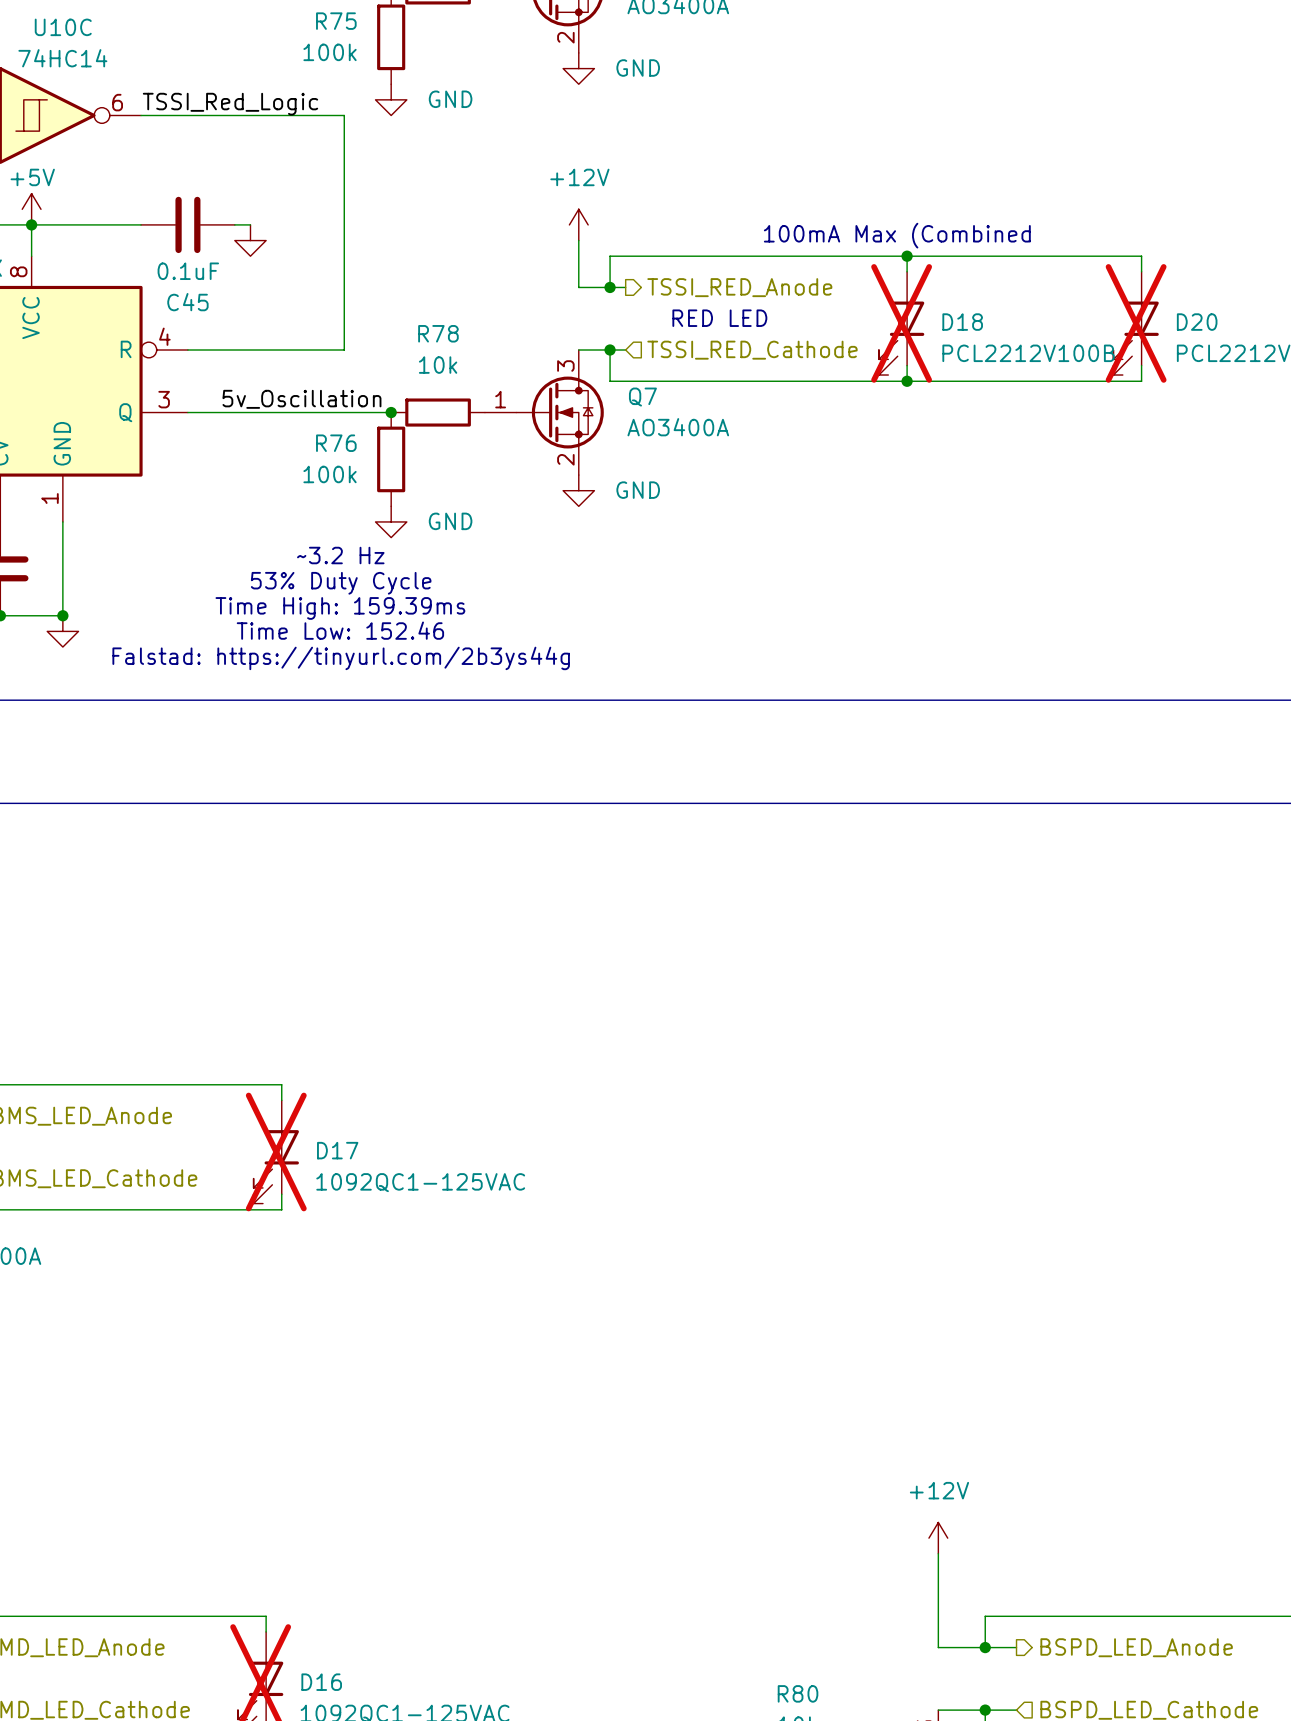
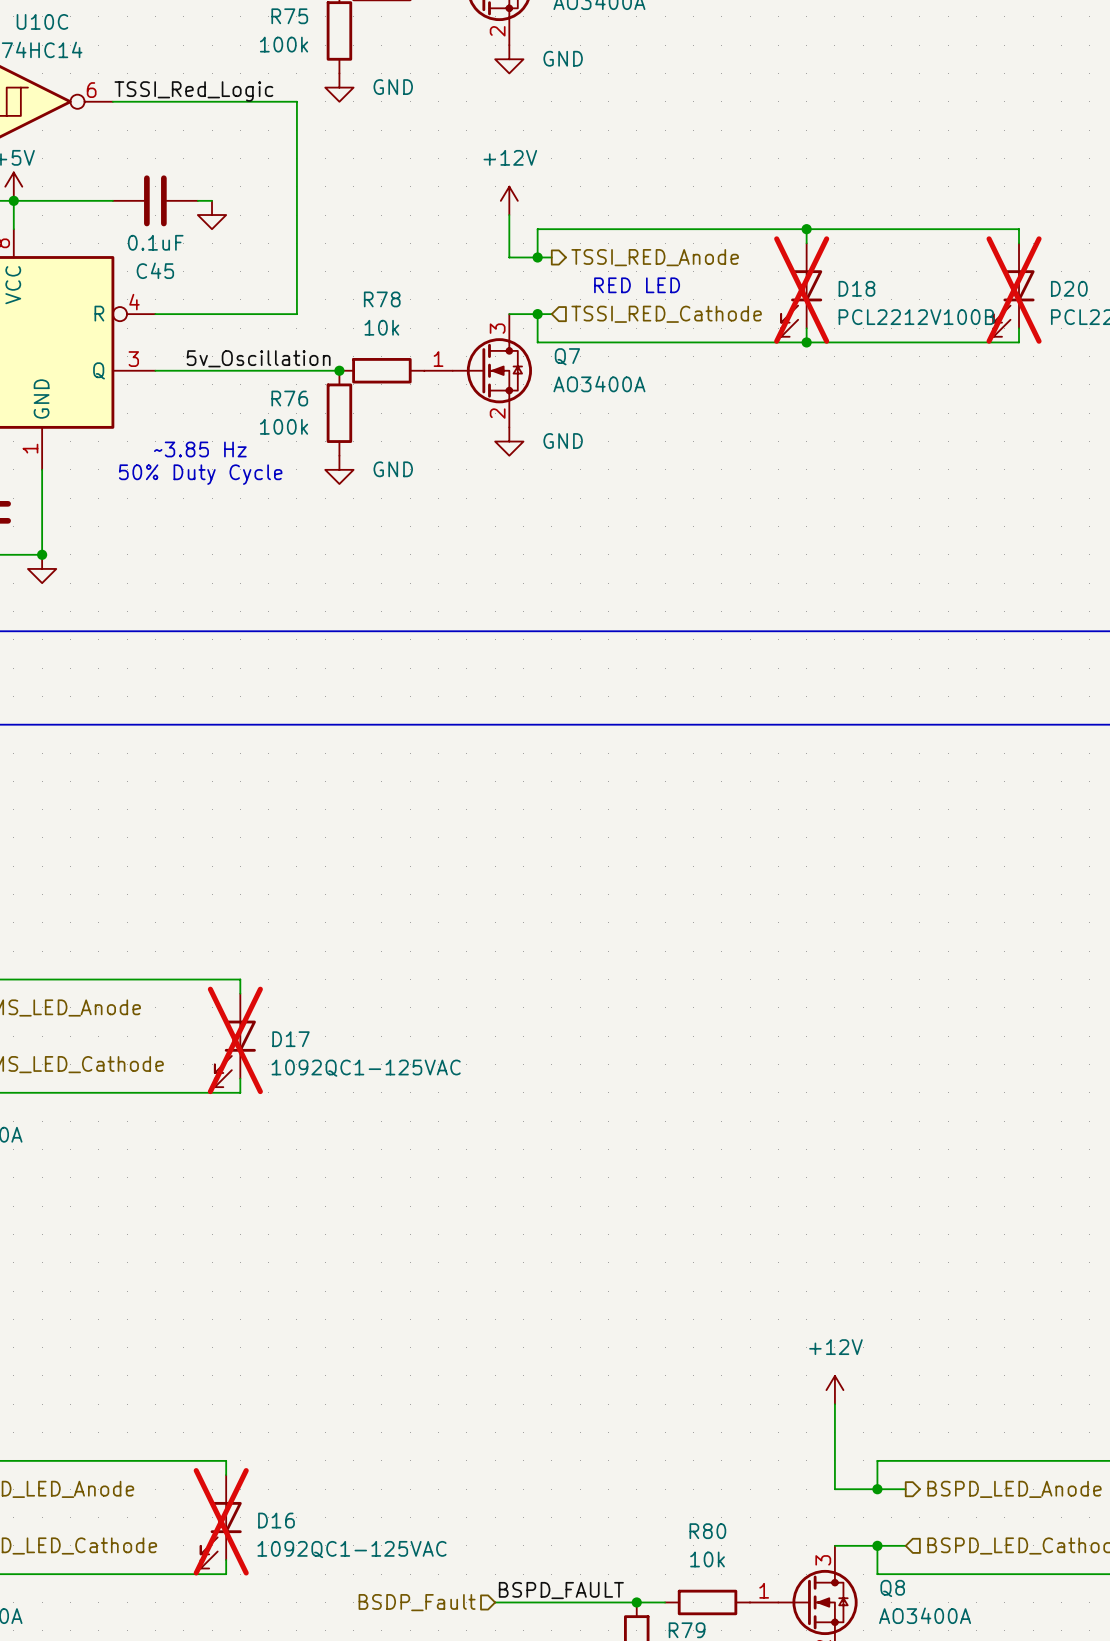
text: 100mA Max (Combined (897, 235) -> none
text: none -> ~3.85 Hz (200, 449)
text: none -> 50% Duty Cycle (200, 474)
text: ~3.2 Hz (340, 555) -> none
text: 53% Duty Cycle (341, 583) -> none
text: Time High: 159.39ms (340, 608) -> none
text: Time Low: 152.46 (340, 630) -> none
text: Falstad: https://tinyurl.com/2b3ys44g (341, 658) -> none

